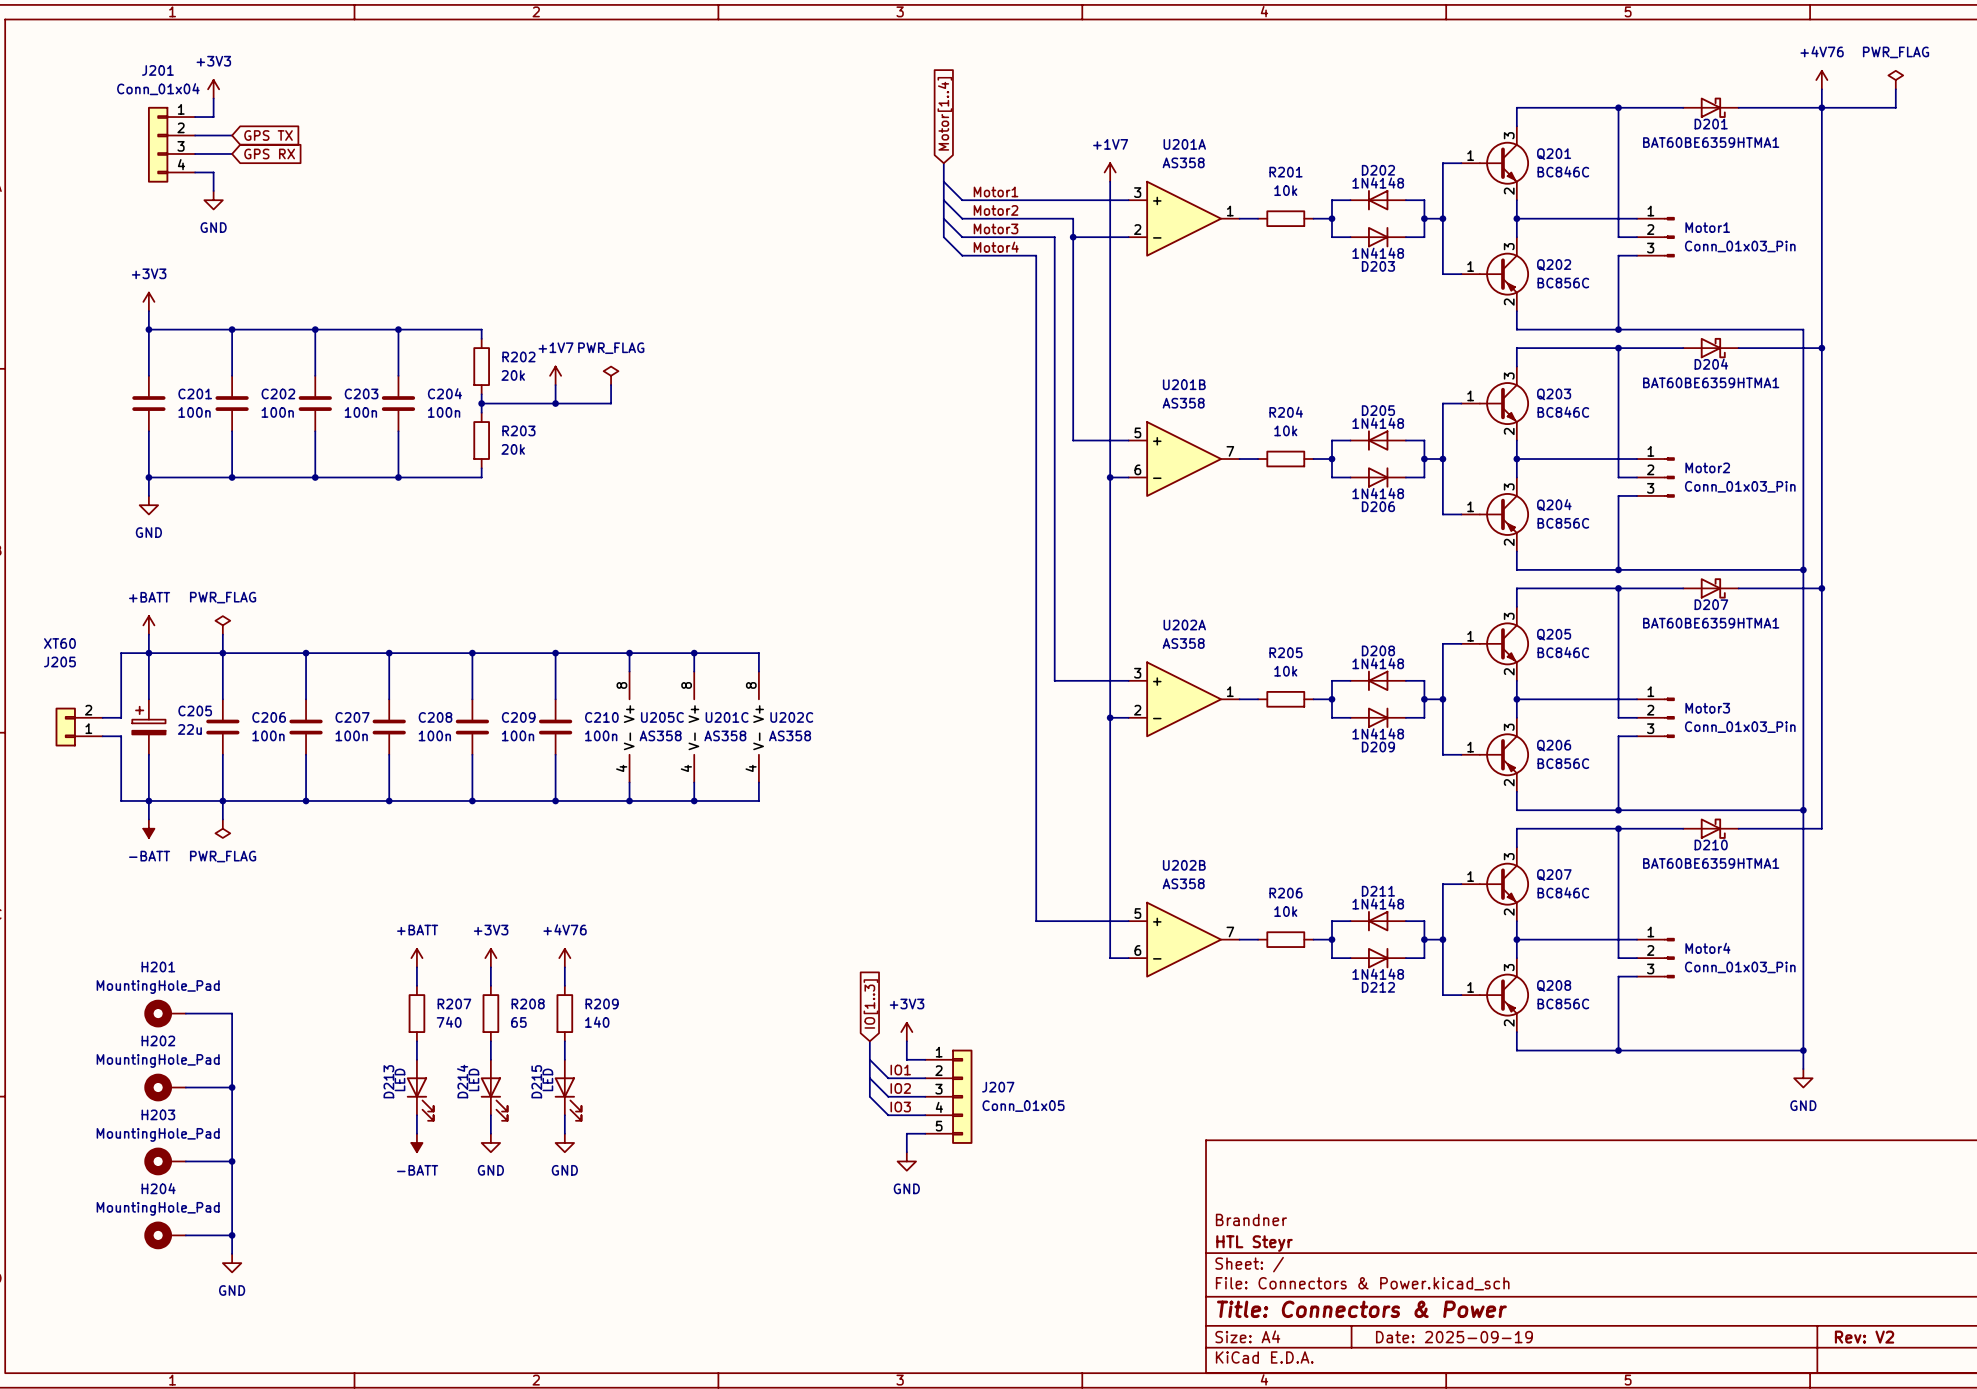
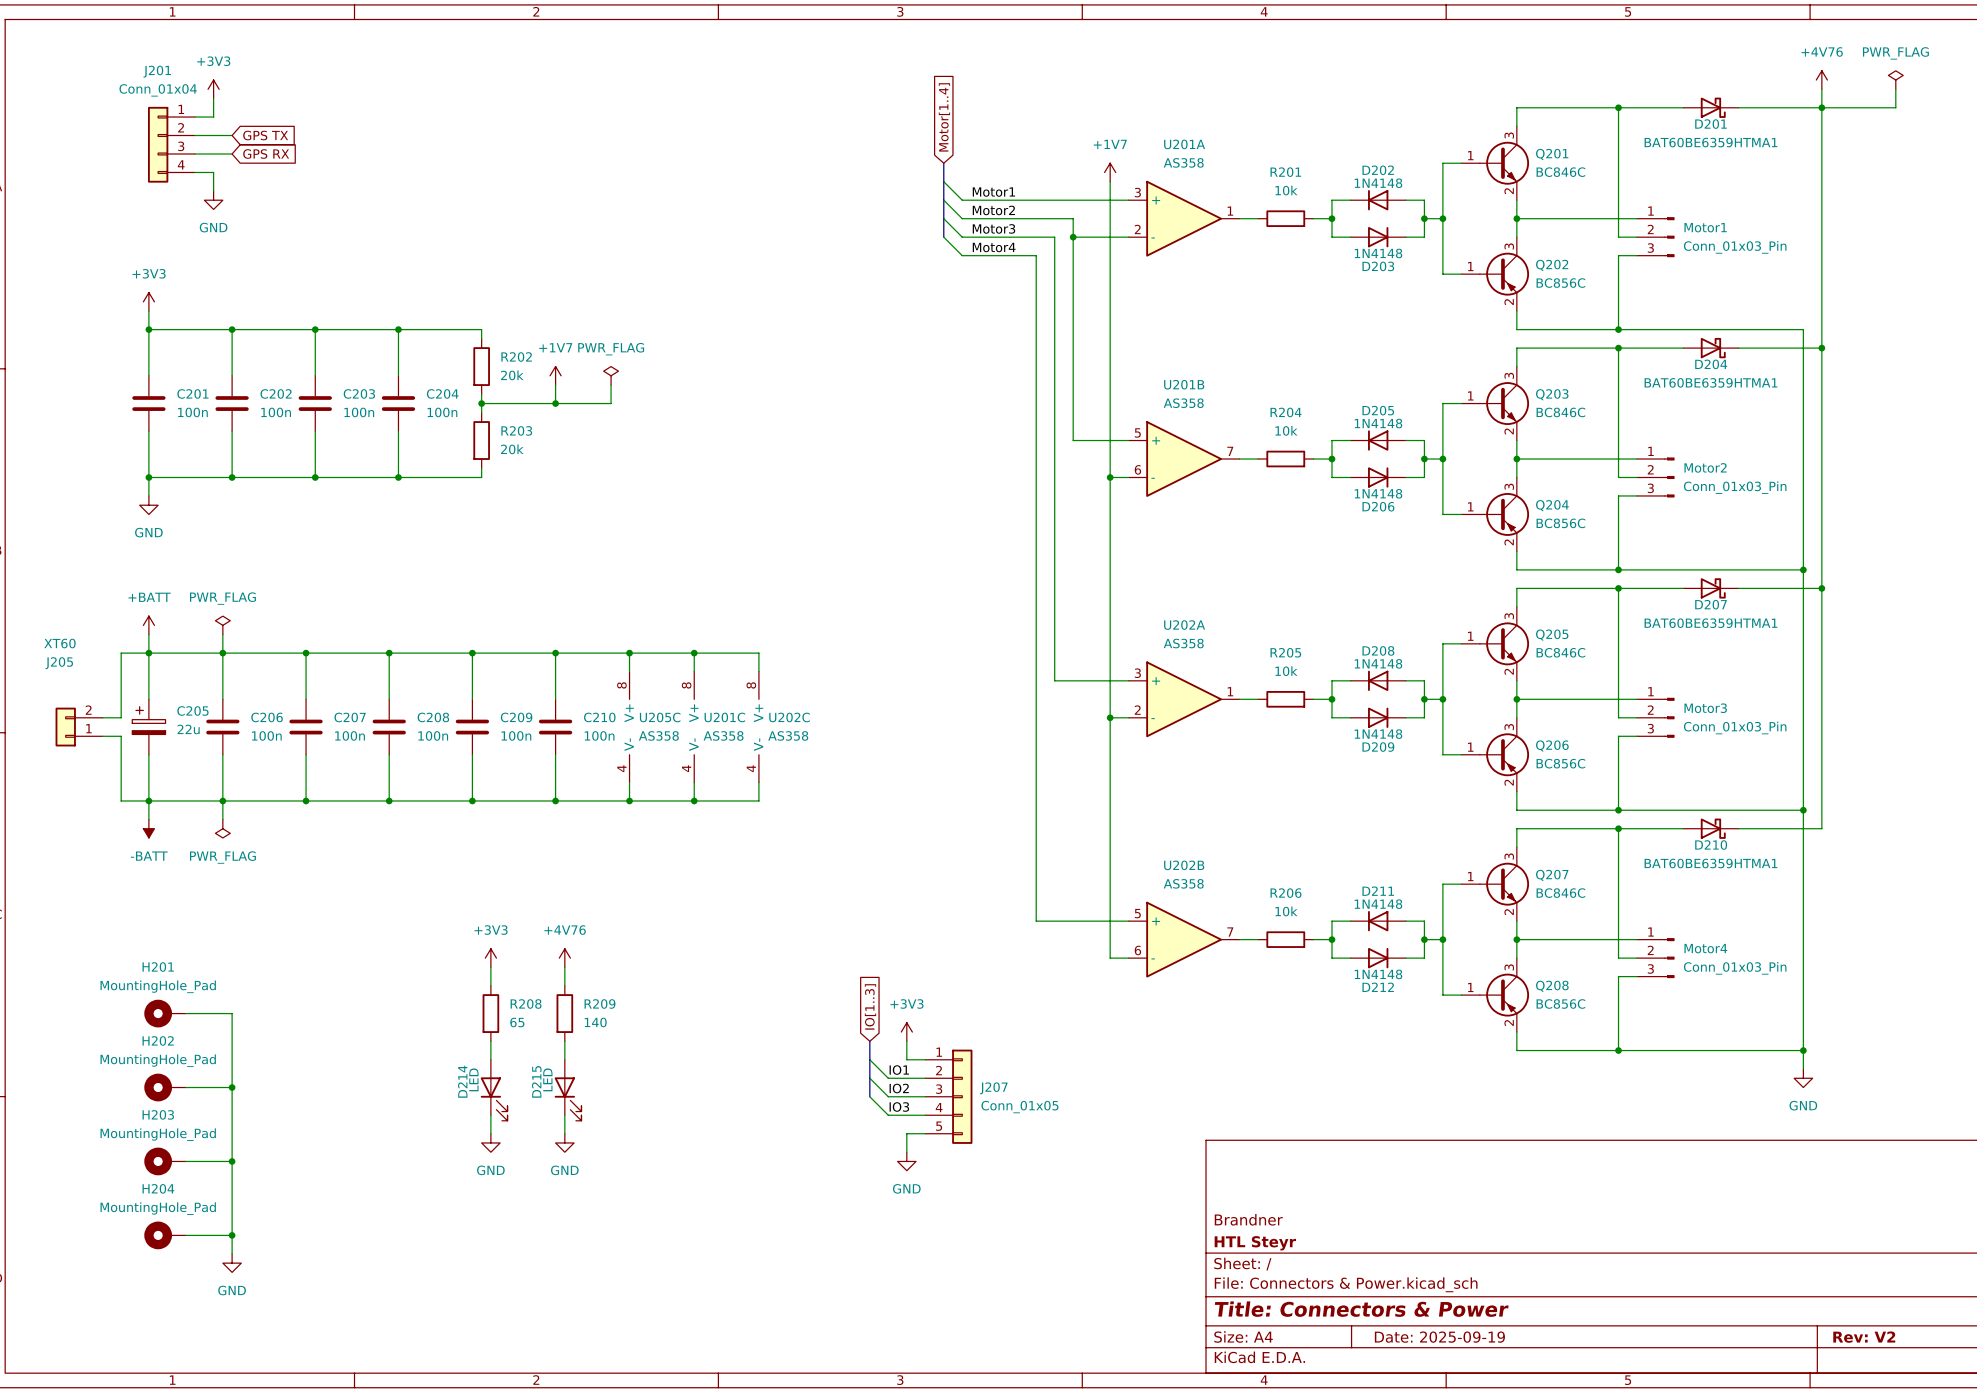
power symbol: +BATT (416, 958) -> none
wire: (416, 967) (416, 985) -> none
R207: 740 (416, 1013) -> none
wire: (416, 1041) (416, 1059) -> none
D213: LED (420, 1090) -> none
wire: (416, 1115) (416, 1133) -> none
power symbol: -BATT (416, 1142) -> none

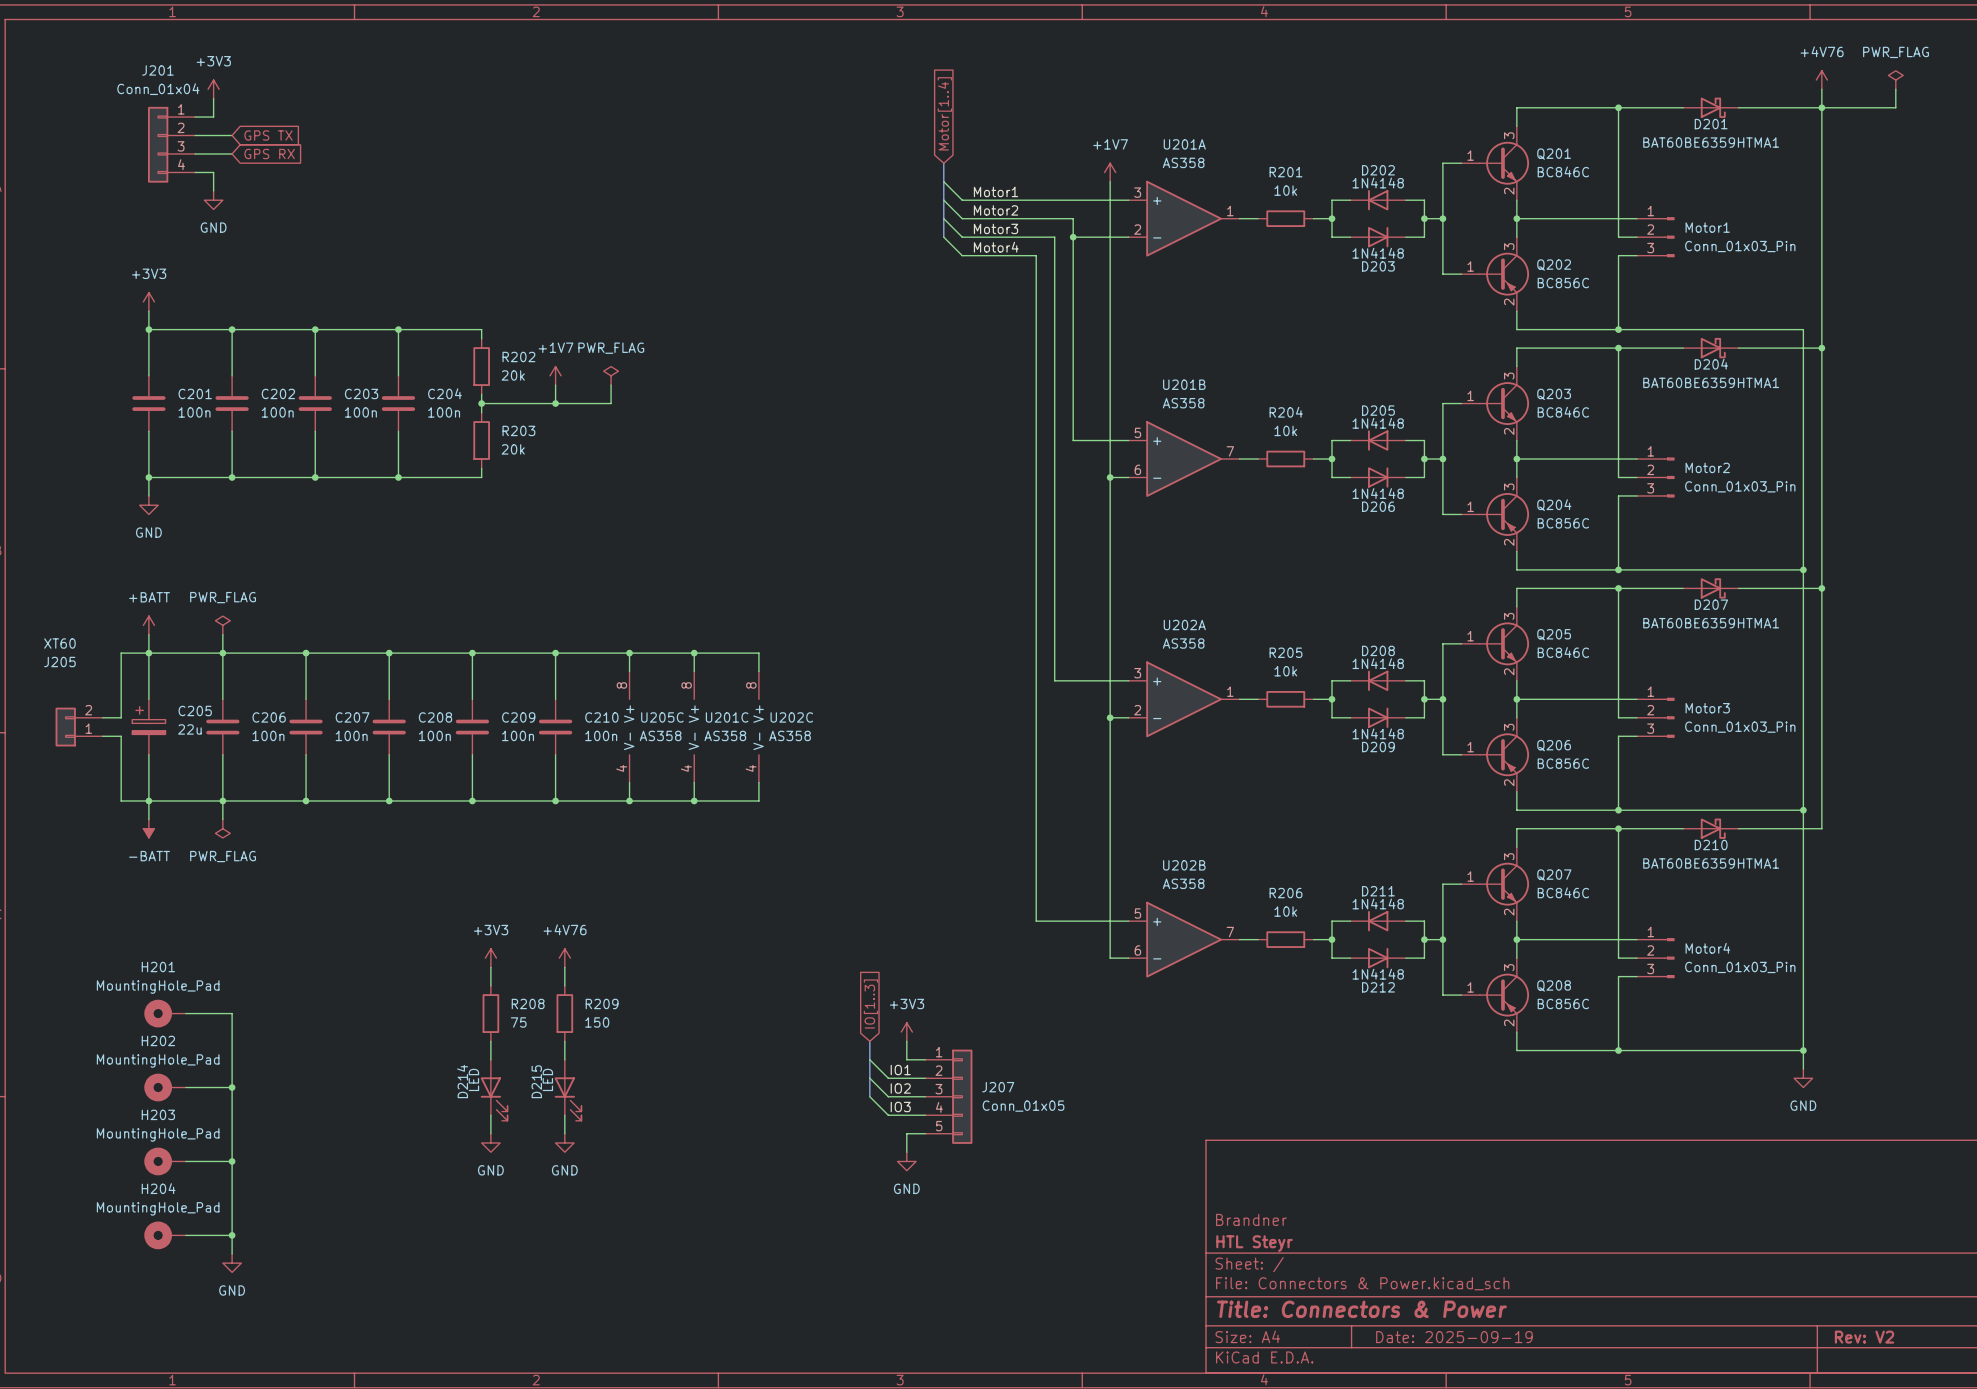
R208 value: 65 (517, 1022) -> 75 (518, 1022)
R209 value: 140 (595, 1022) -> 150 (597, 1022)

